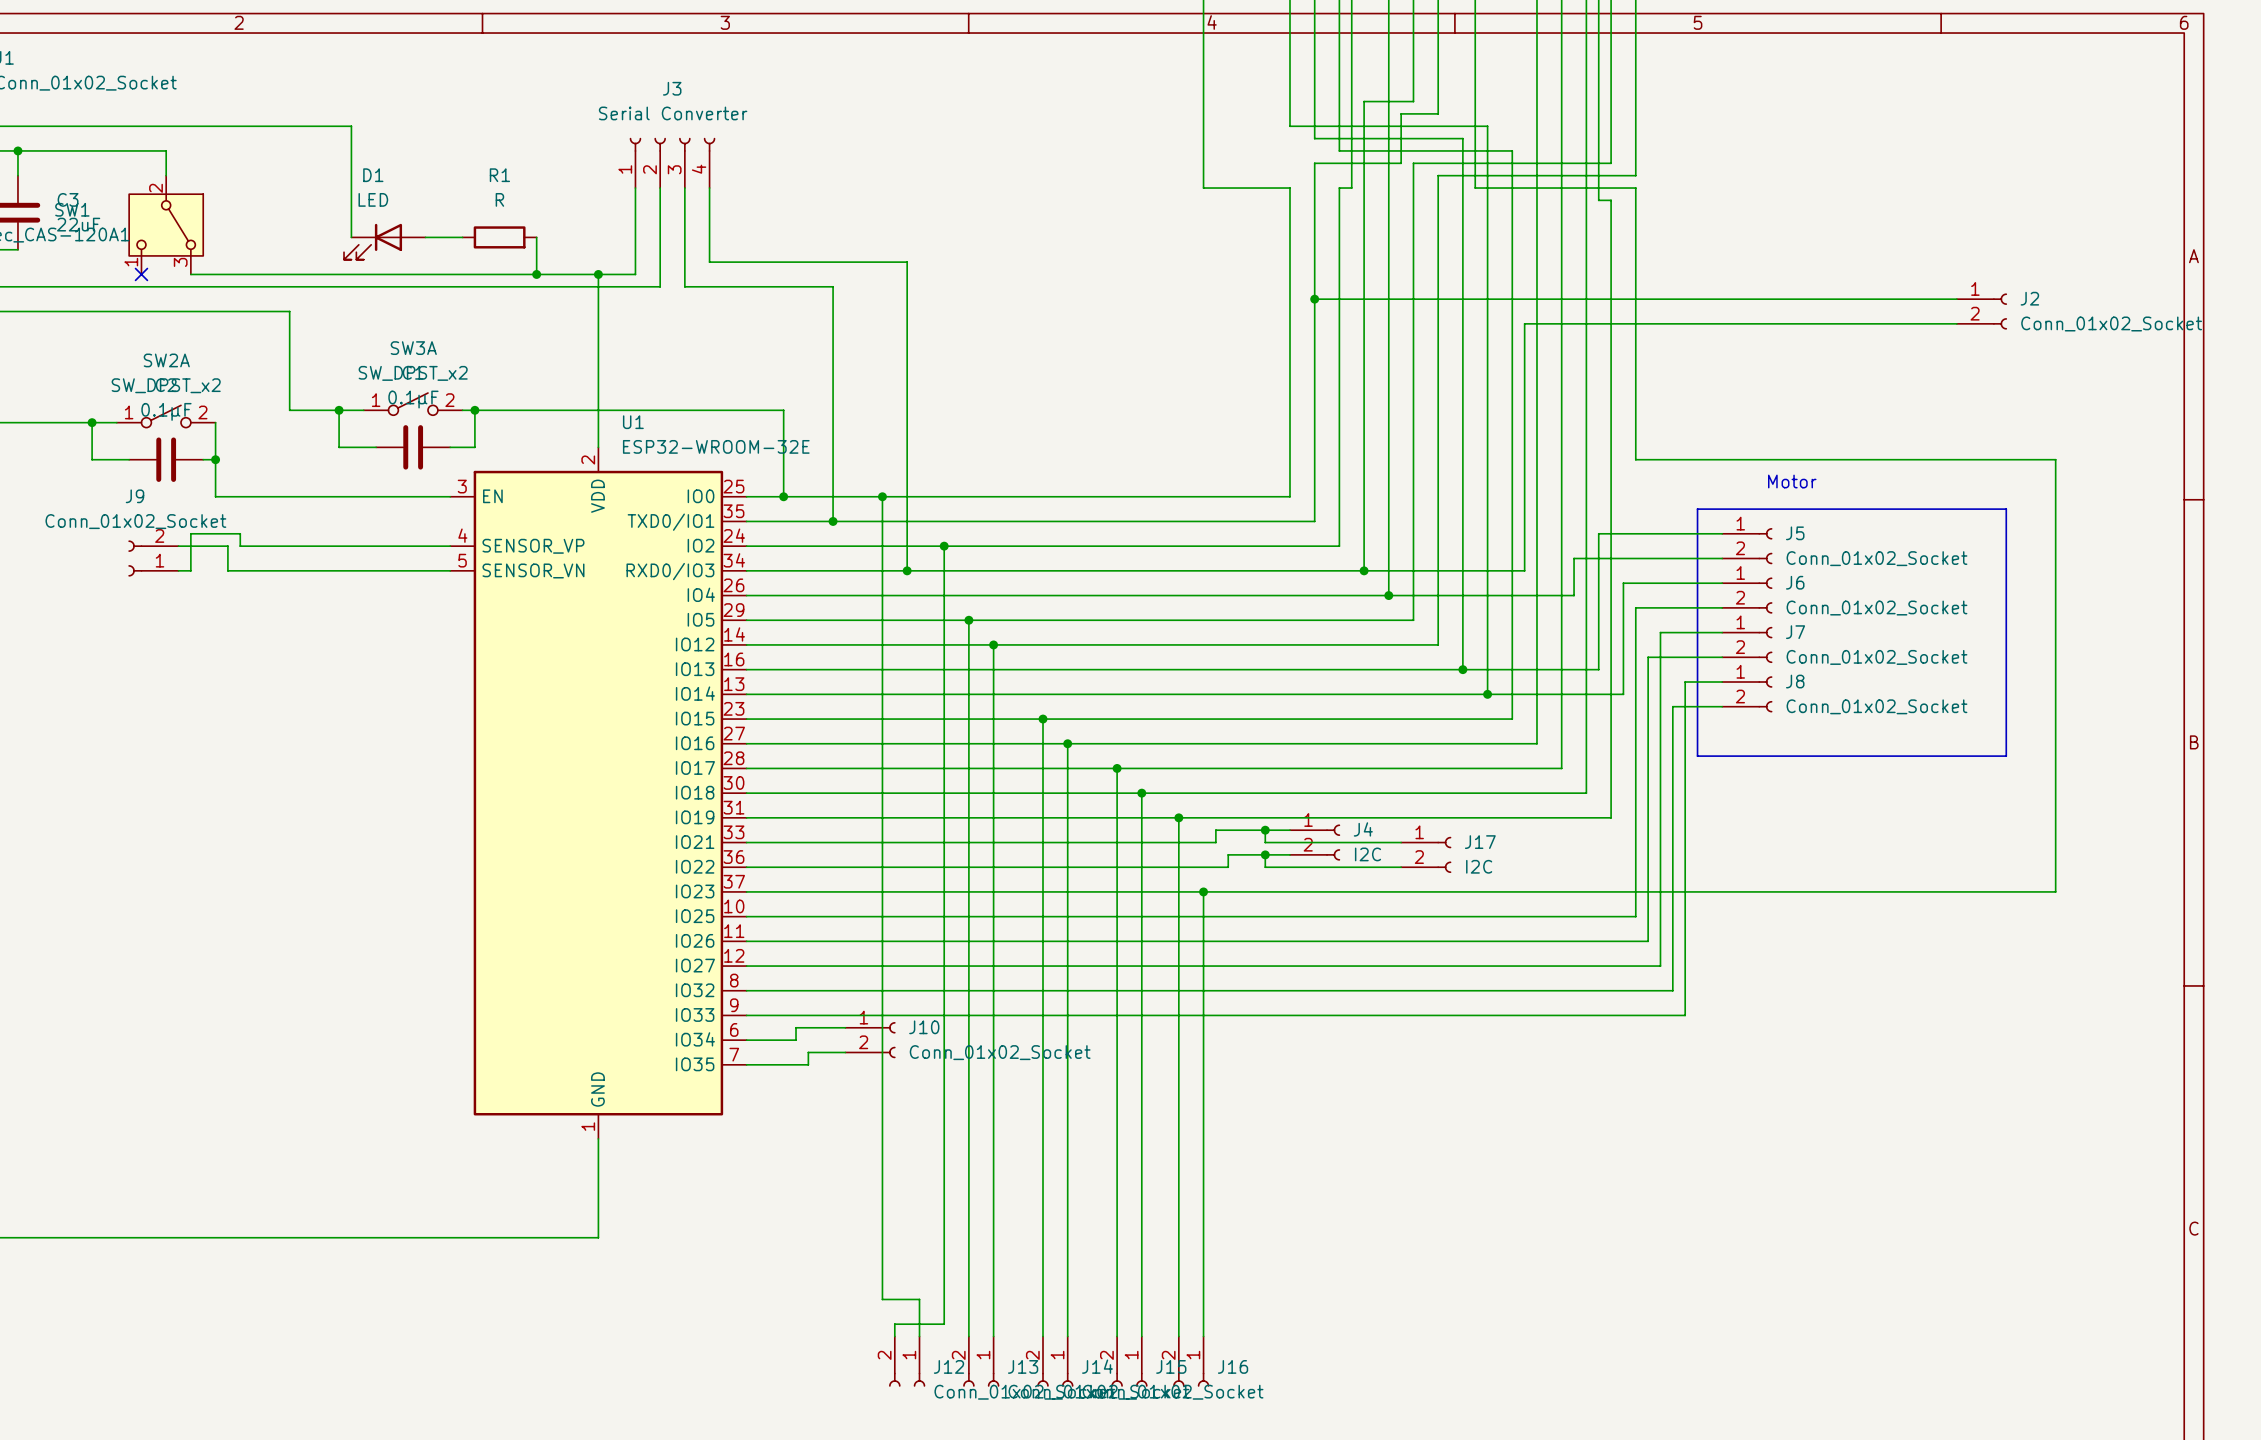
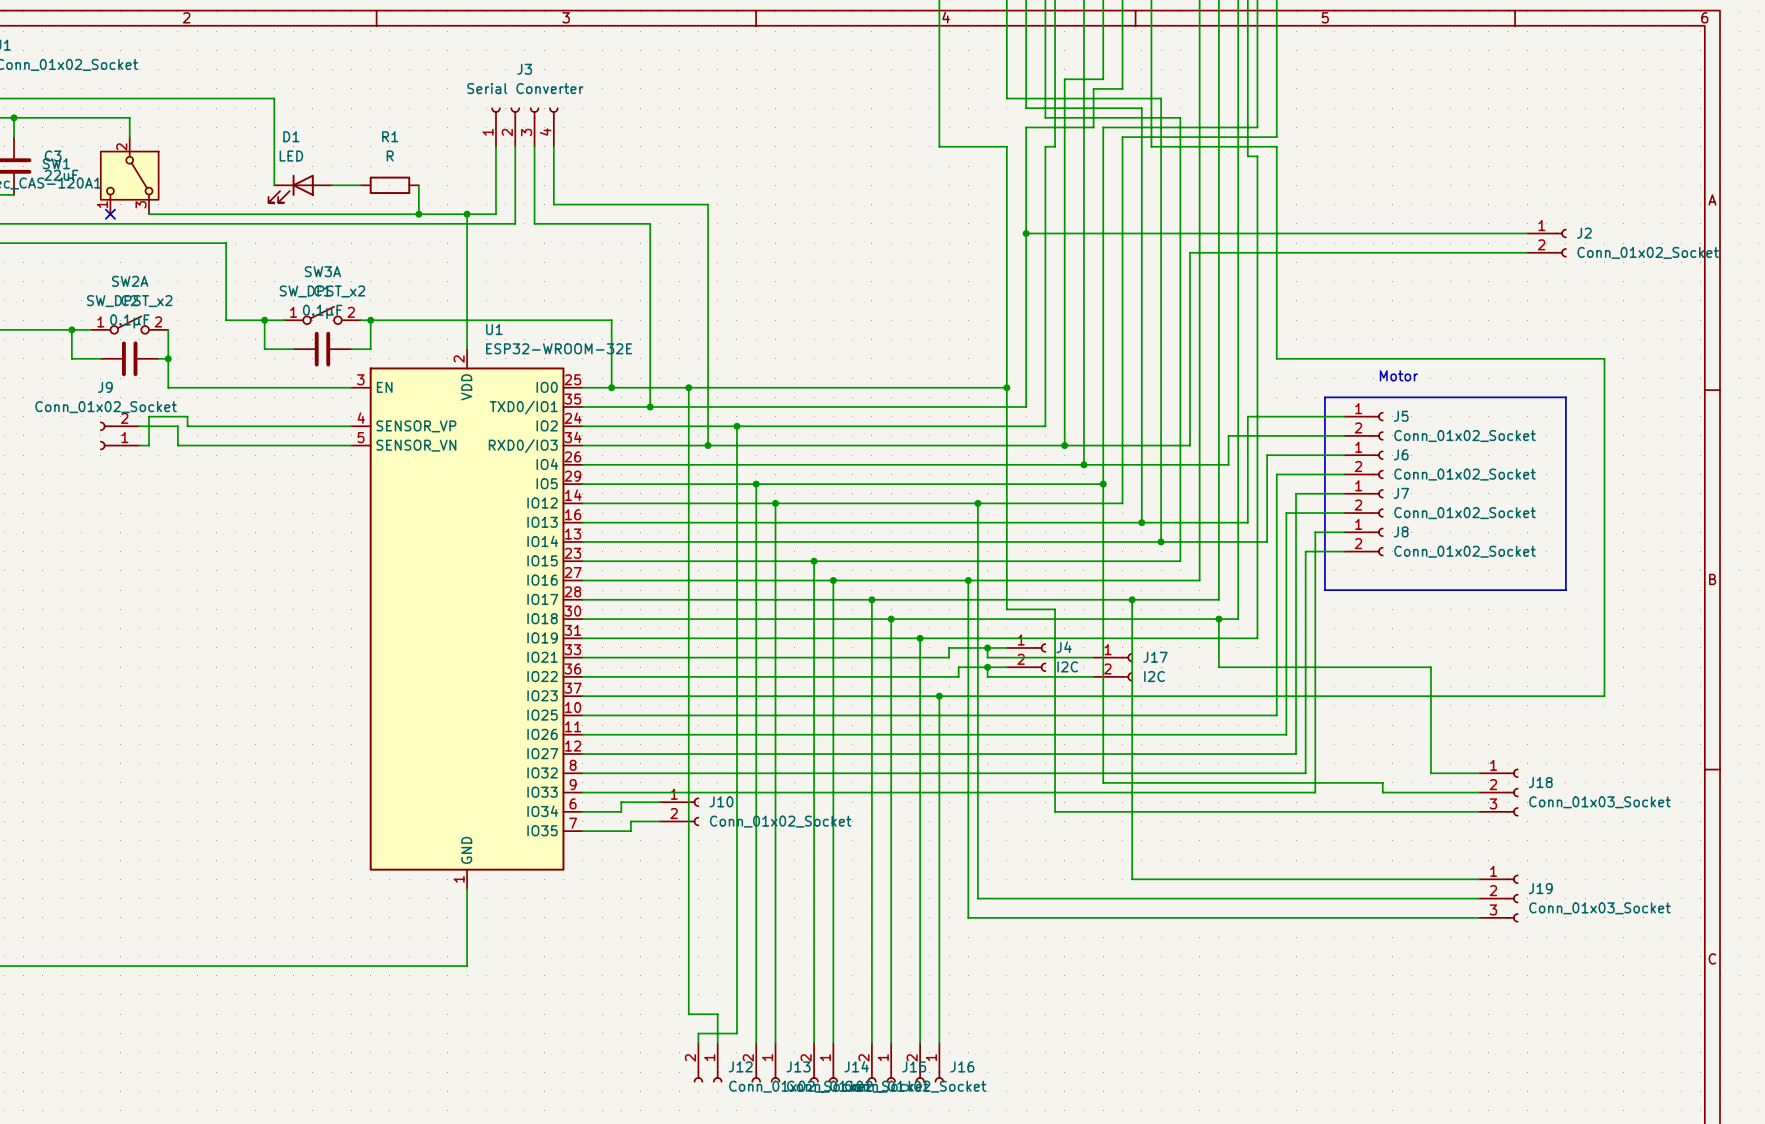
wire: none -> (1006, 387) (1006, 609) (1055, 609) (1055, 811) (1479, 811)
junction: none -> (1006, 387)
wire: none -> (1103, 484) (1103, 782) (1382, 782) (1382, 792) (1479, 792)
junction: none -> (1103, 484)
wire: none -> (977, 503) (977, 898) (1479, 898)
junction: none -> (977, 503)
wire: none -> (968, 580) (968, 917) (1479, 917)
junction: none -> (968, 580)
wire: none -> (1132, 599) (1132, 879) (1479, 879)
junction: none -> (1132, 599)
wire: none -> (1218, 619) (1218, 667) (1430, 667) (1430, 773) (1479, 773)
junction: none -> (1218, 619)
J18: none -> Conn_01x03_Socket (1498, 792)
J19: none -> Conn_01x03_Socket (1498, 898)

